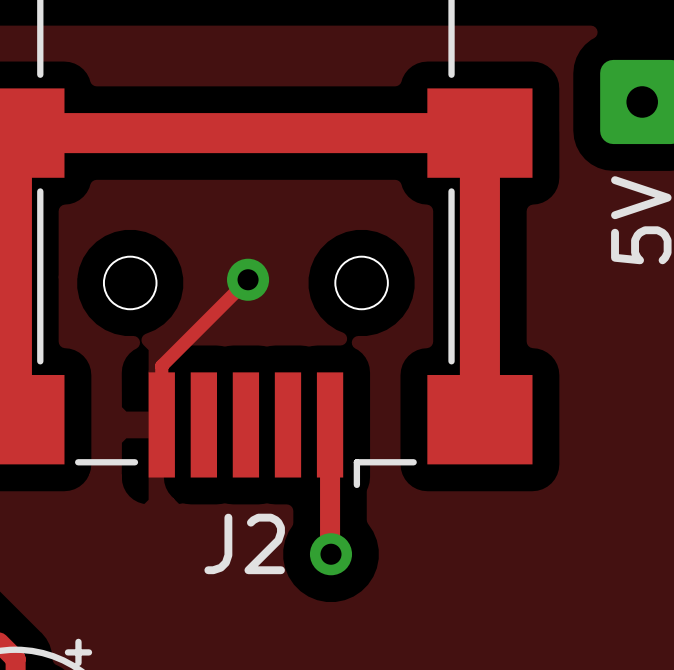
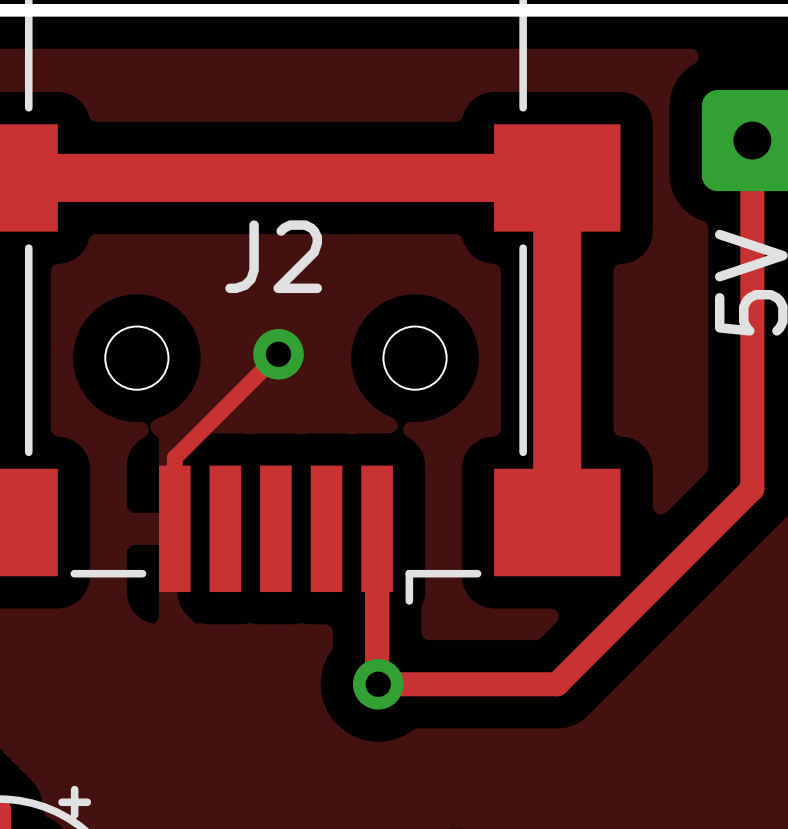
track: none -> (752, 140) (752, 488) (556, 684) (378, 684)
J2 name position: J2 (244, 543) -> J2 (273, 256)

